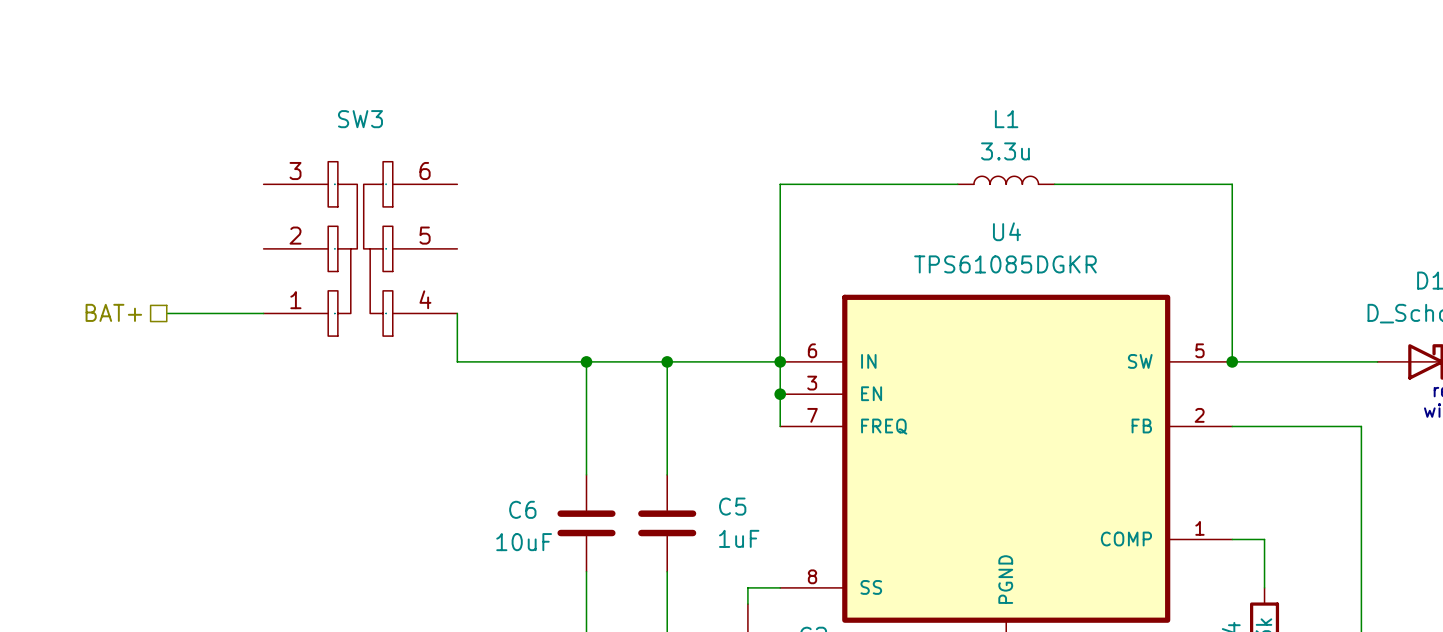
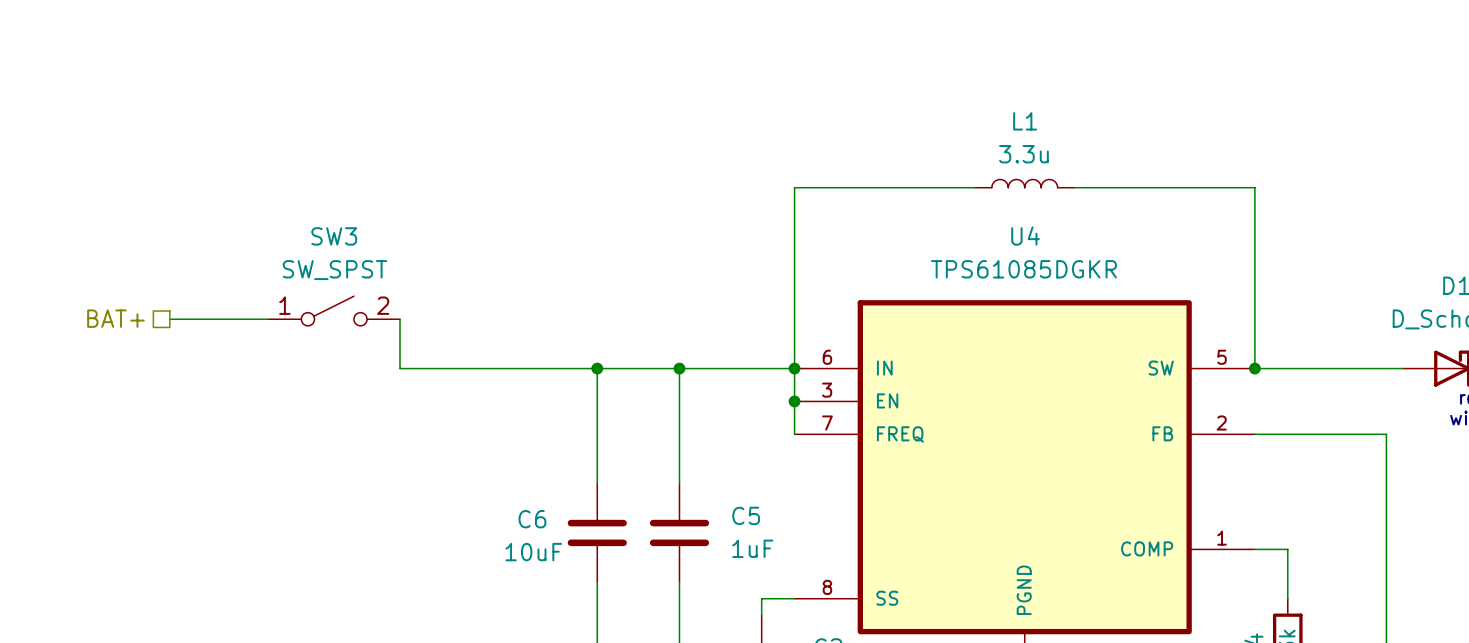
SW3 name position: SW3 (360, 119) -> SW3 (334, 236)
SW3 symbol: [263, 161, 458, 337] -> [268, 296, 400, 326]
SW3 value: none -> SW_SPST (335, 270)
wire: (457, 313) (457, 361) -> (399, 319) (399, 368) (465, 368)

